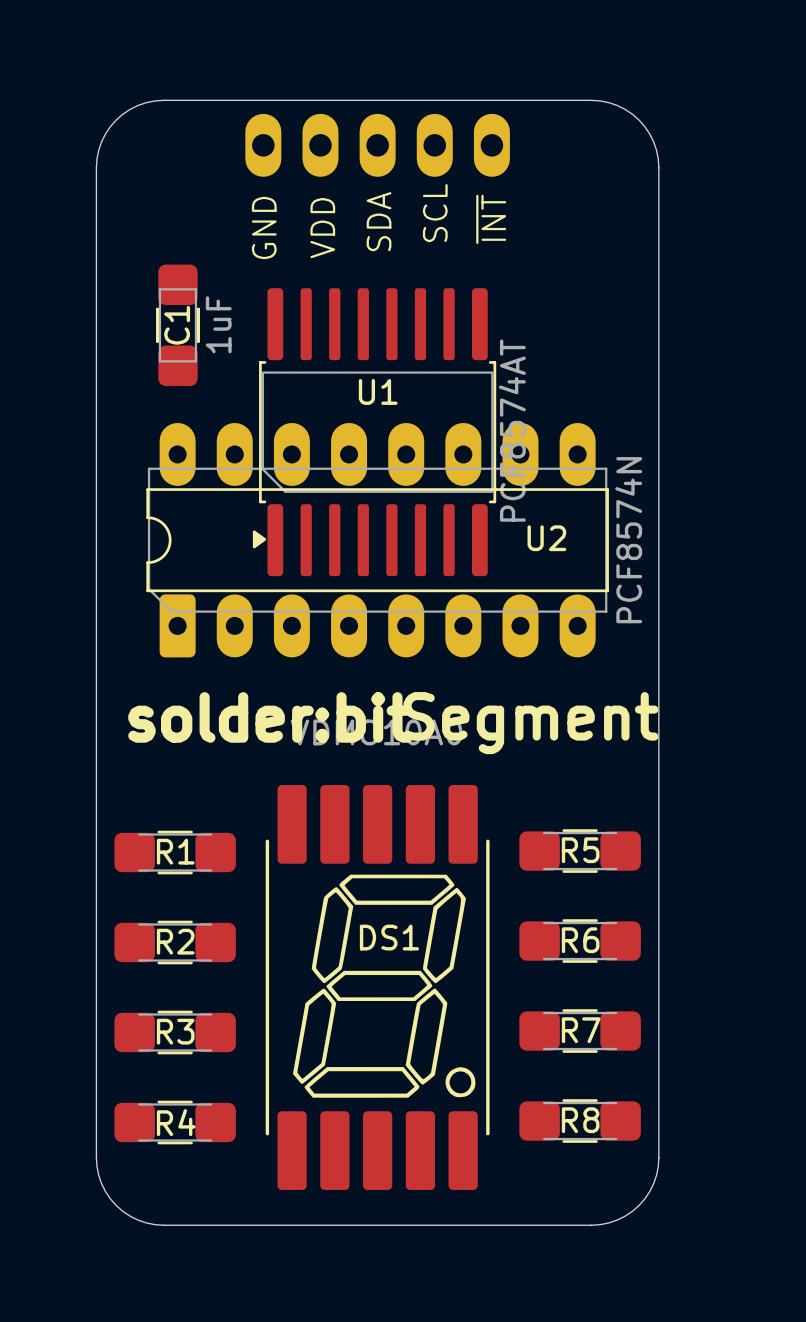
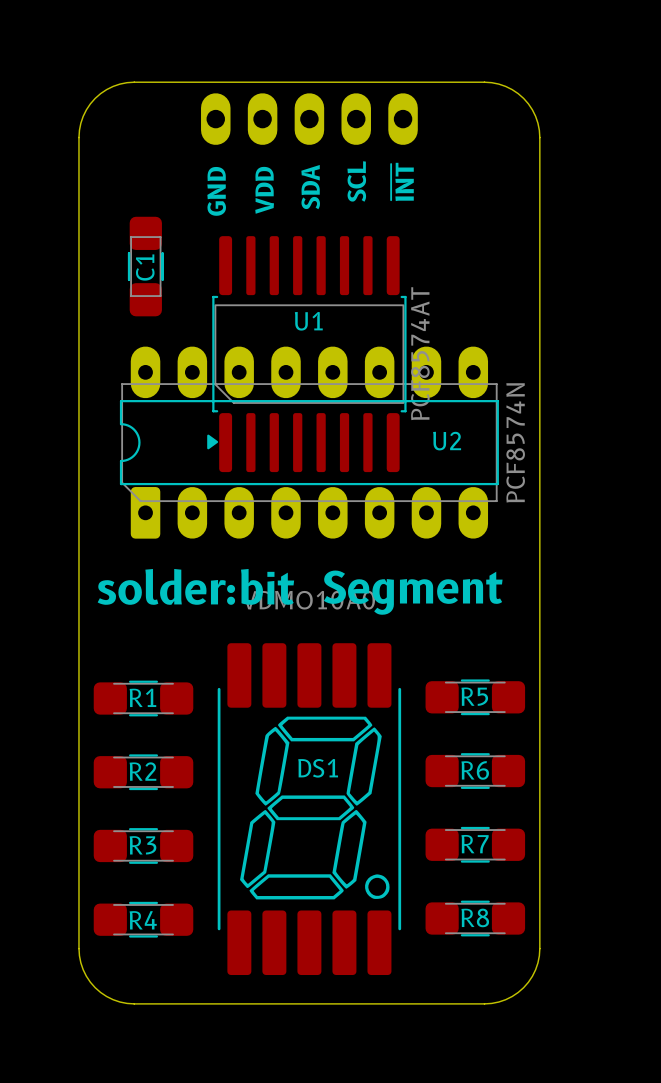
C1 value: 1uF (218, 324) -> none

